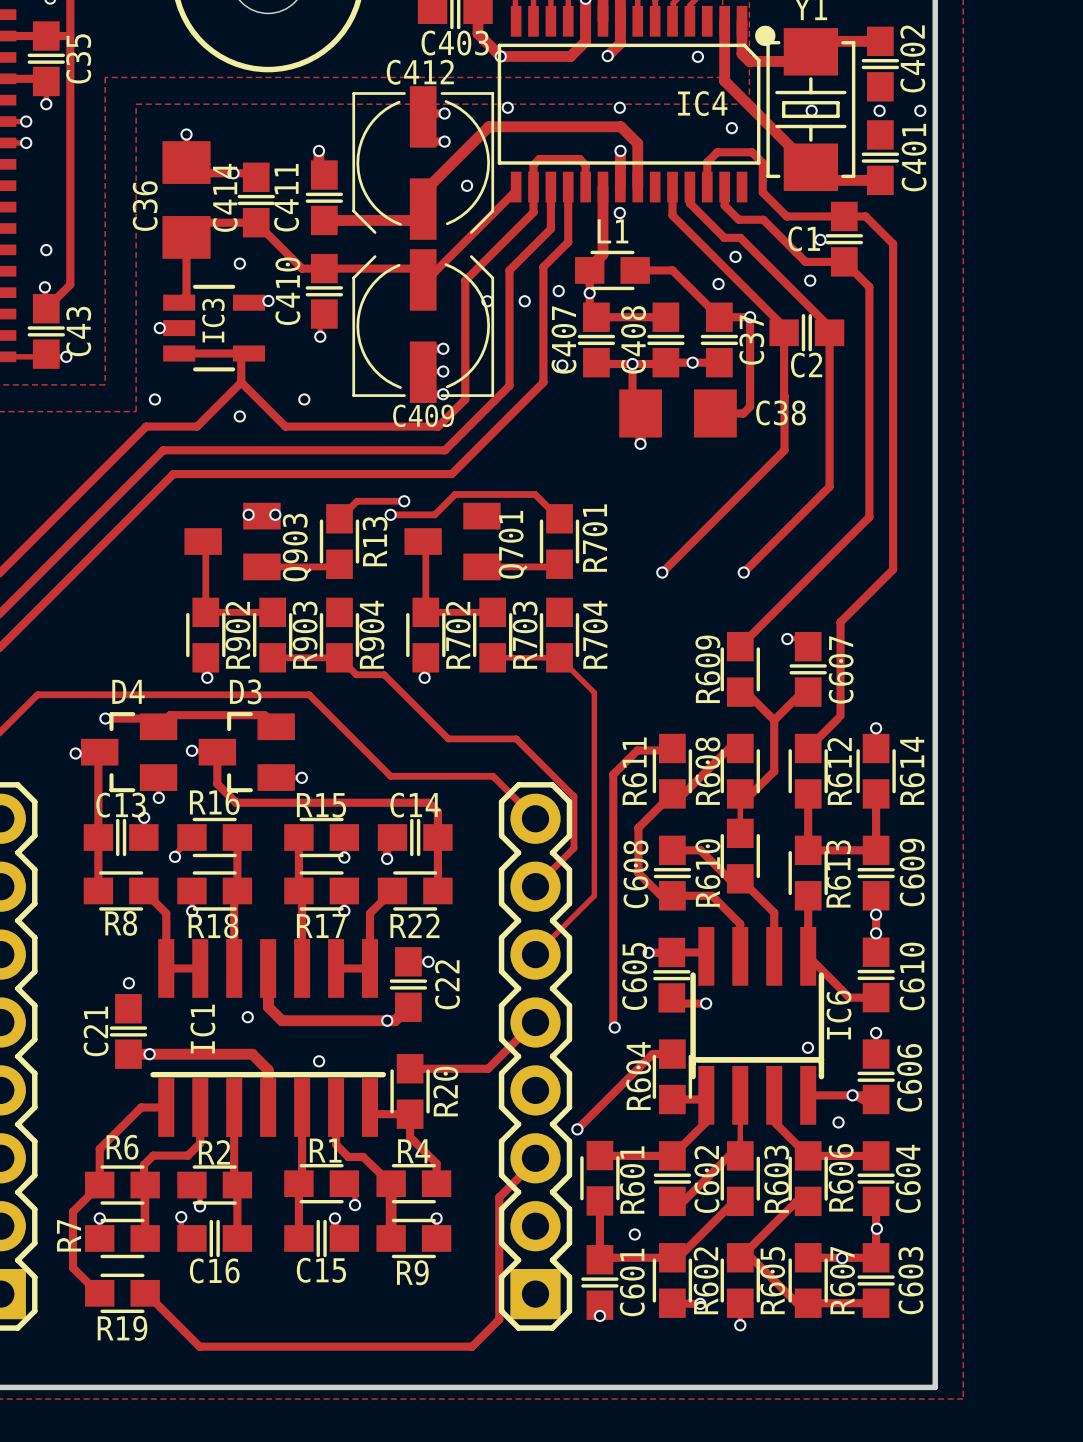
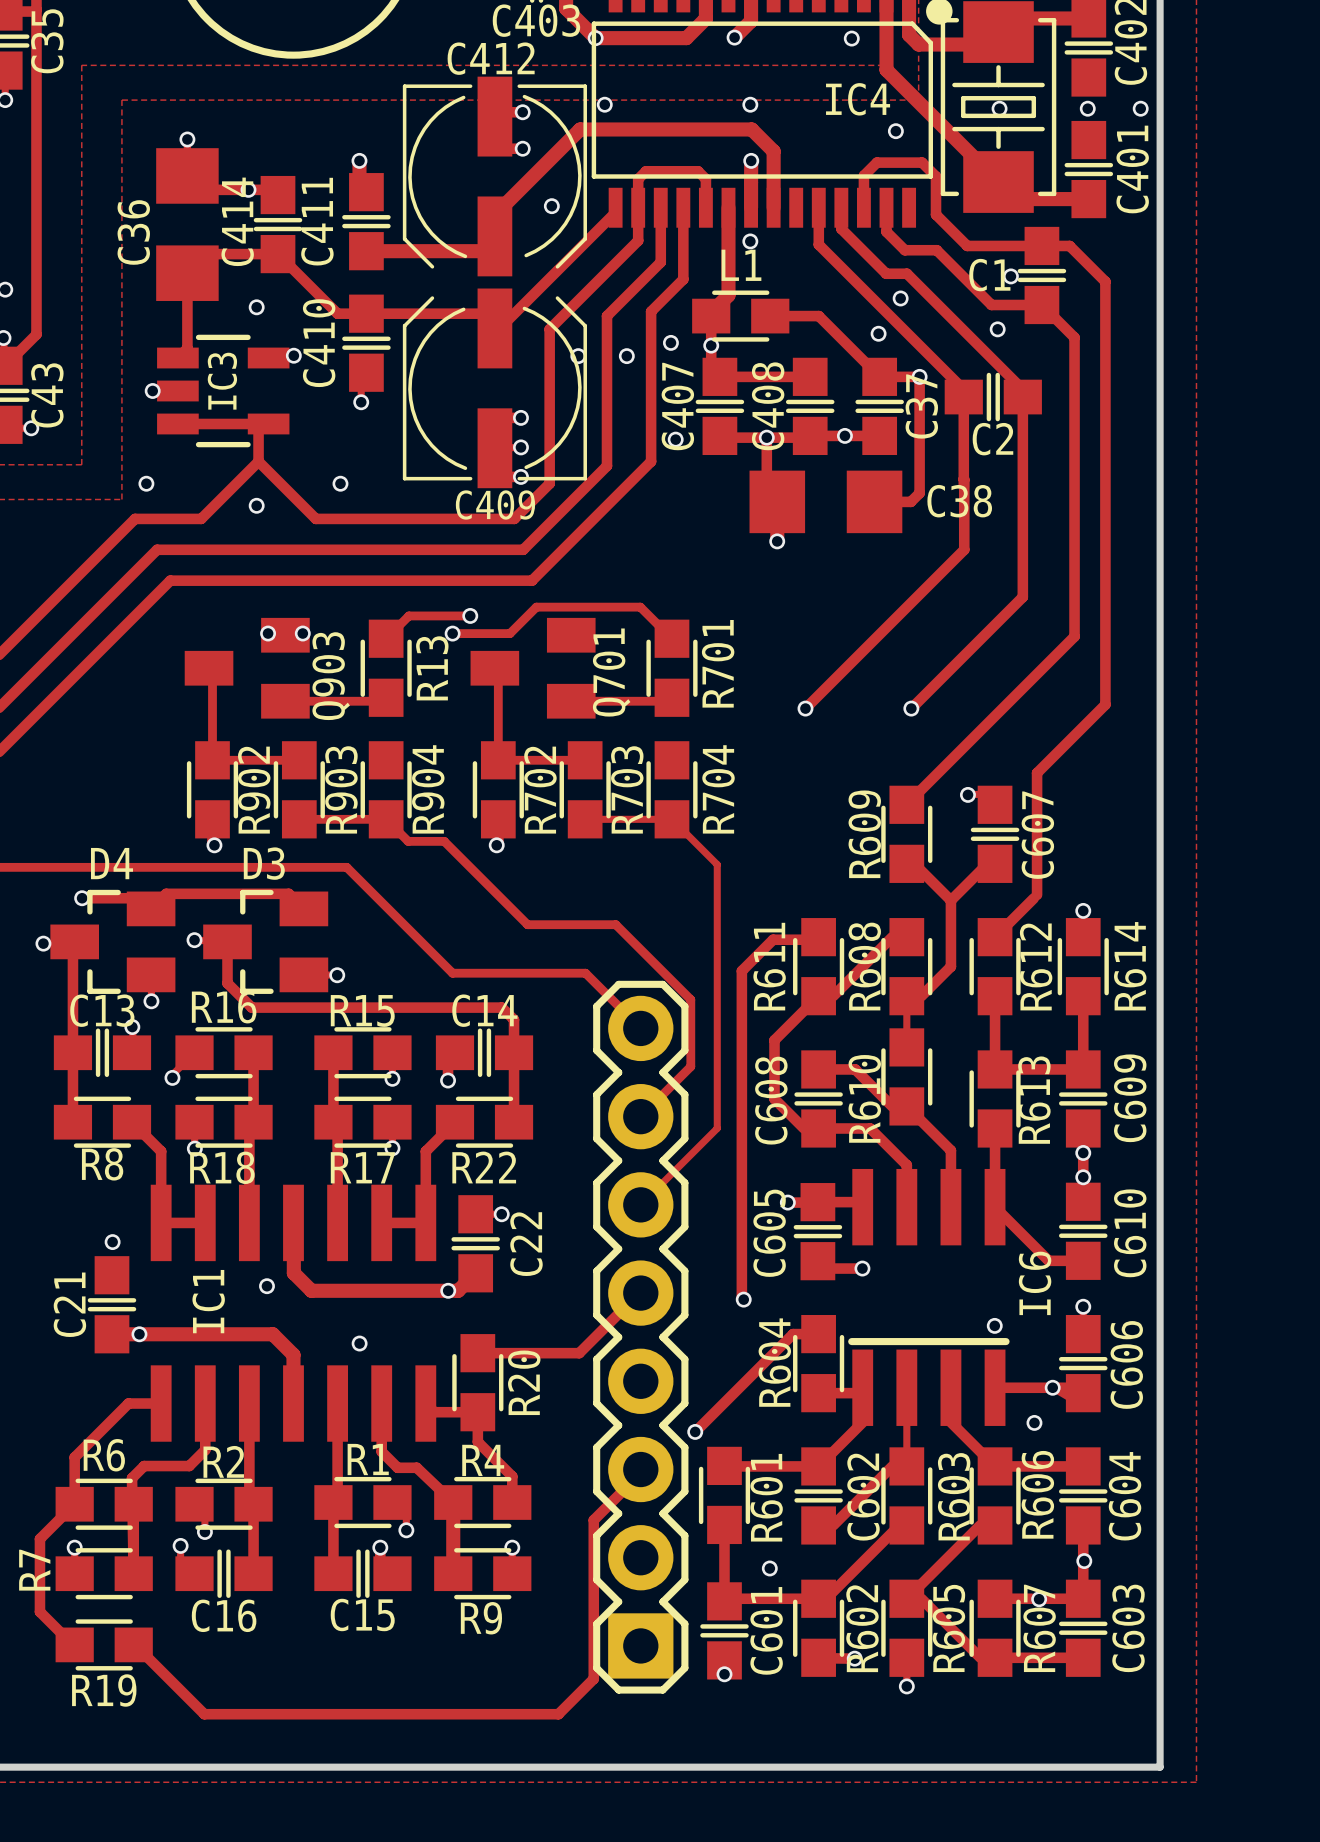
IC6 footprint: [690, 926, 825, 1125] -> [852, 1168, 1006, 1426]
IC1 footprint: [150, 939, 386, 1137] -> [150, 1184, 437, 1442]

